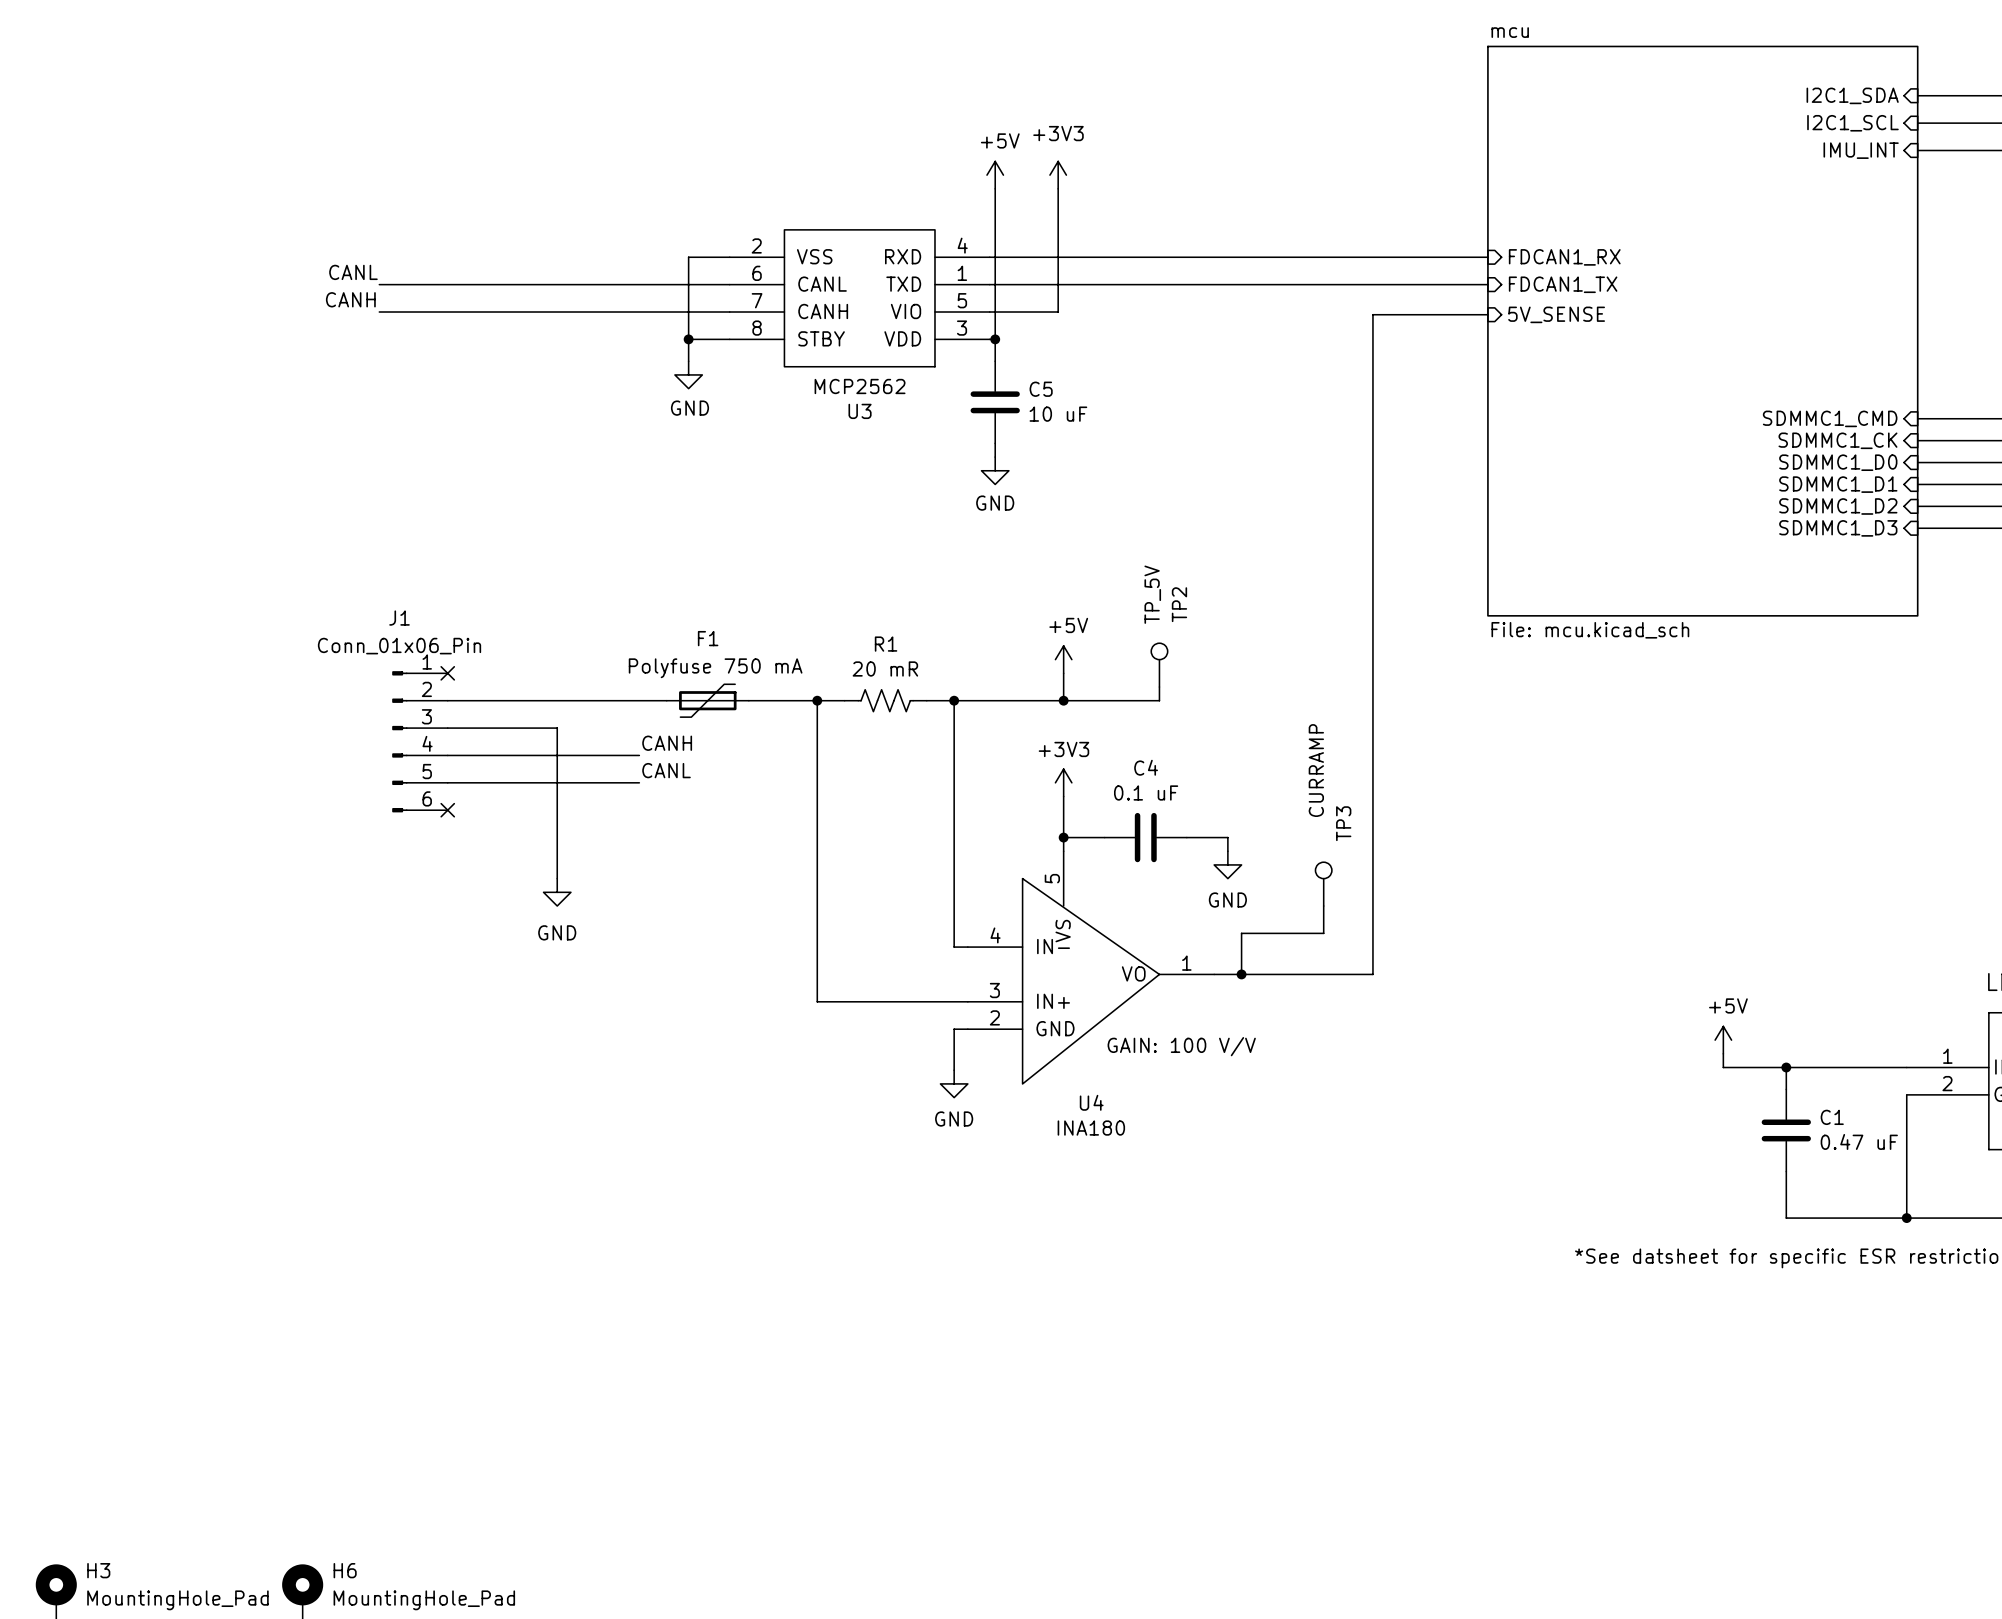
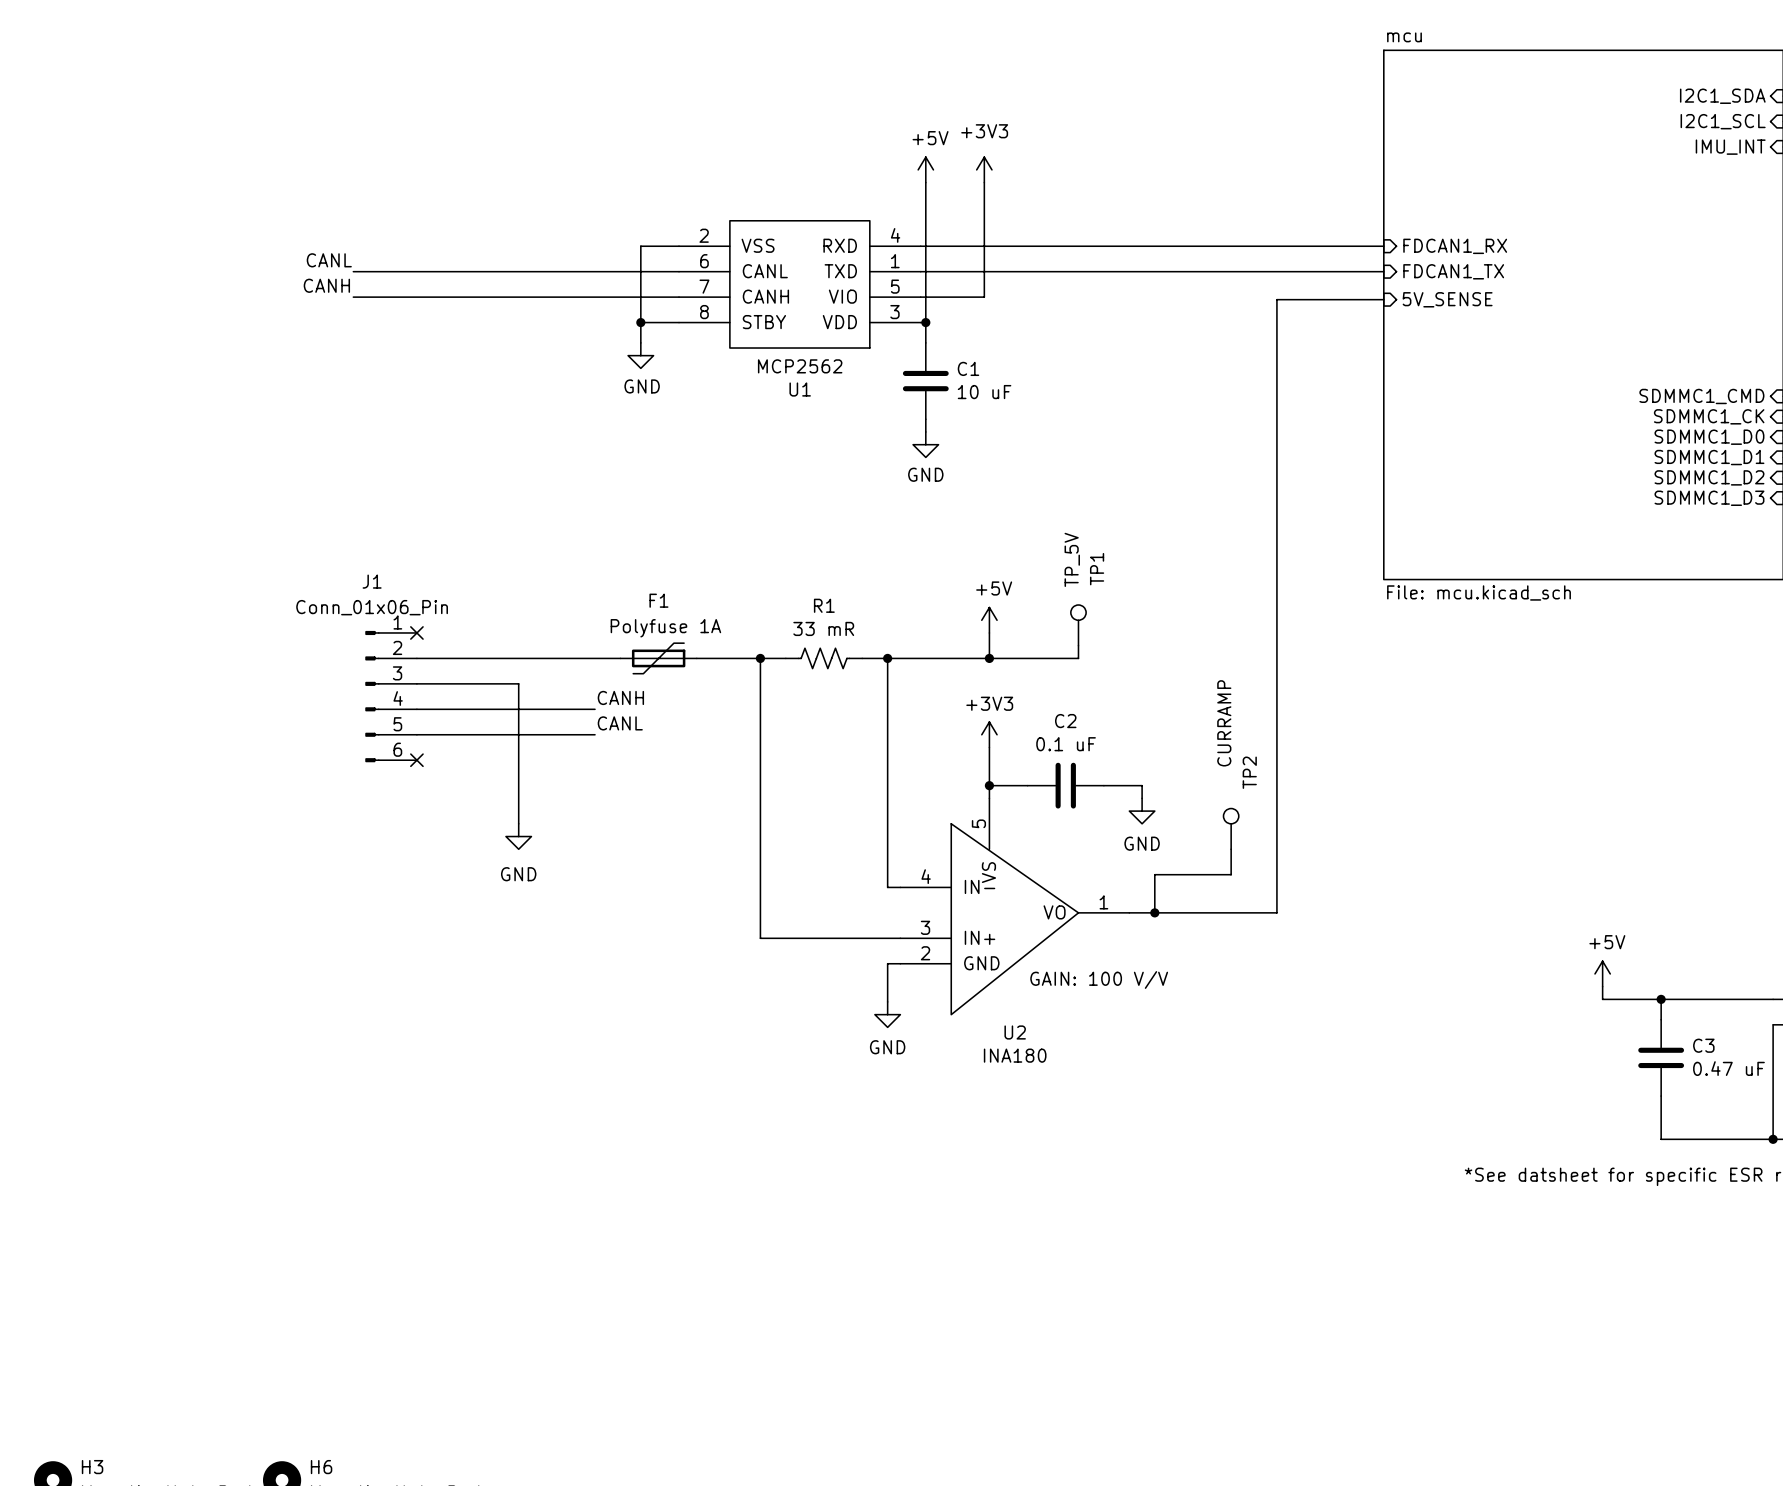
C5 name: C5 (1041, 389) -> C1 (968, 368)
U3 name: U3 (860, 411) -> U1 (800, 389)
TP2 name: TP2 (1179, 604) -> TP1 (1097, 569)
F1 value: Polyfuse 750 mA (715, 668) -> Polyfuse 1A (665, 628)
R1 value: 20 mR (885, 668) -> 33 mR (823, 628)
C4 name: C4 (1146, 767) -> C2 (1065, 721)
TP3 name: TP3 (1343, 823) -> TP2 (1249, 772)
U4 name: U4 (1091, 1102) -> U2 (1015, 1032)
C1 name: C1 (1832, 1117) -> C3 (1703, 1045)

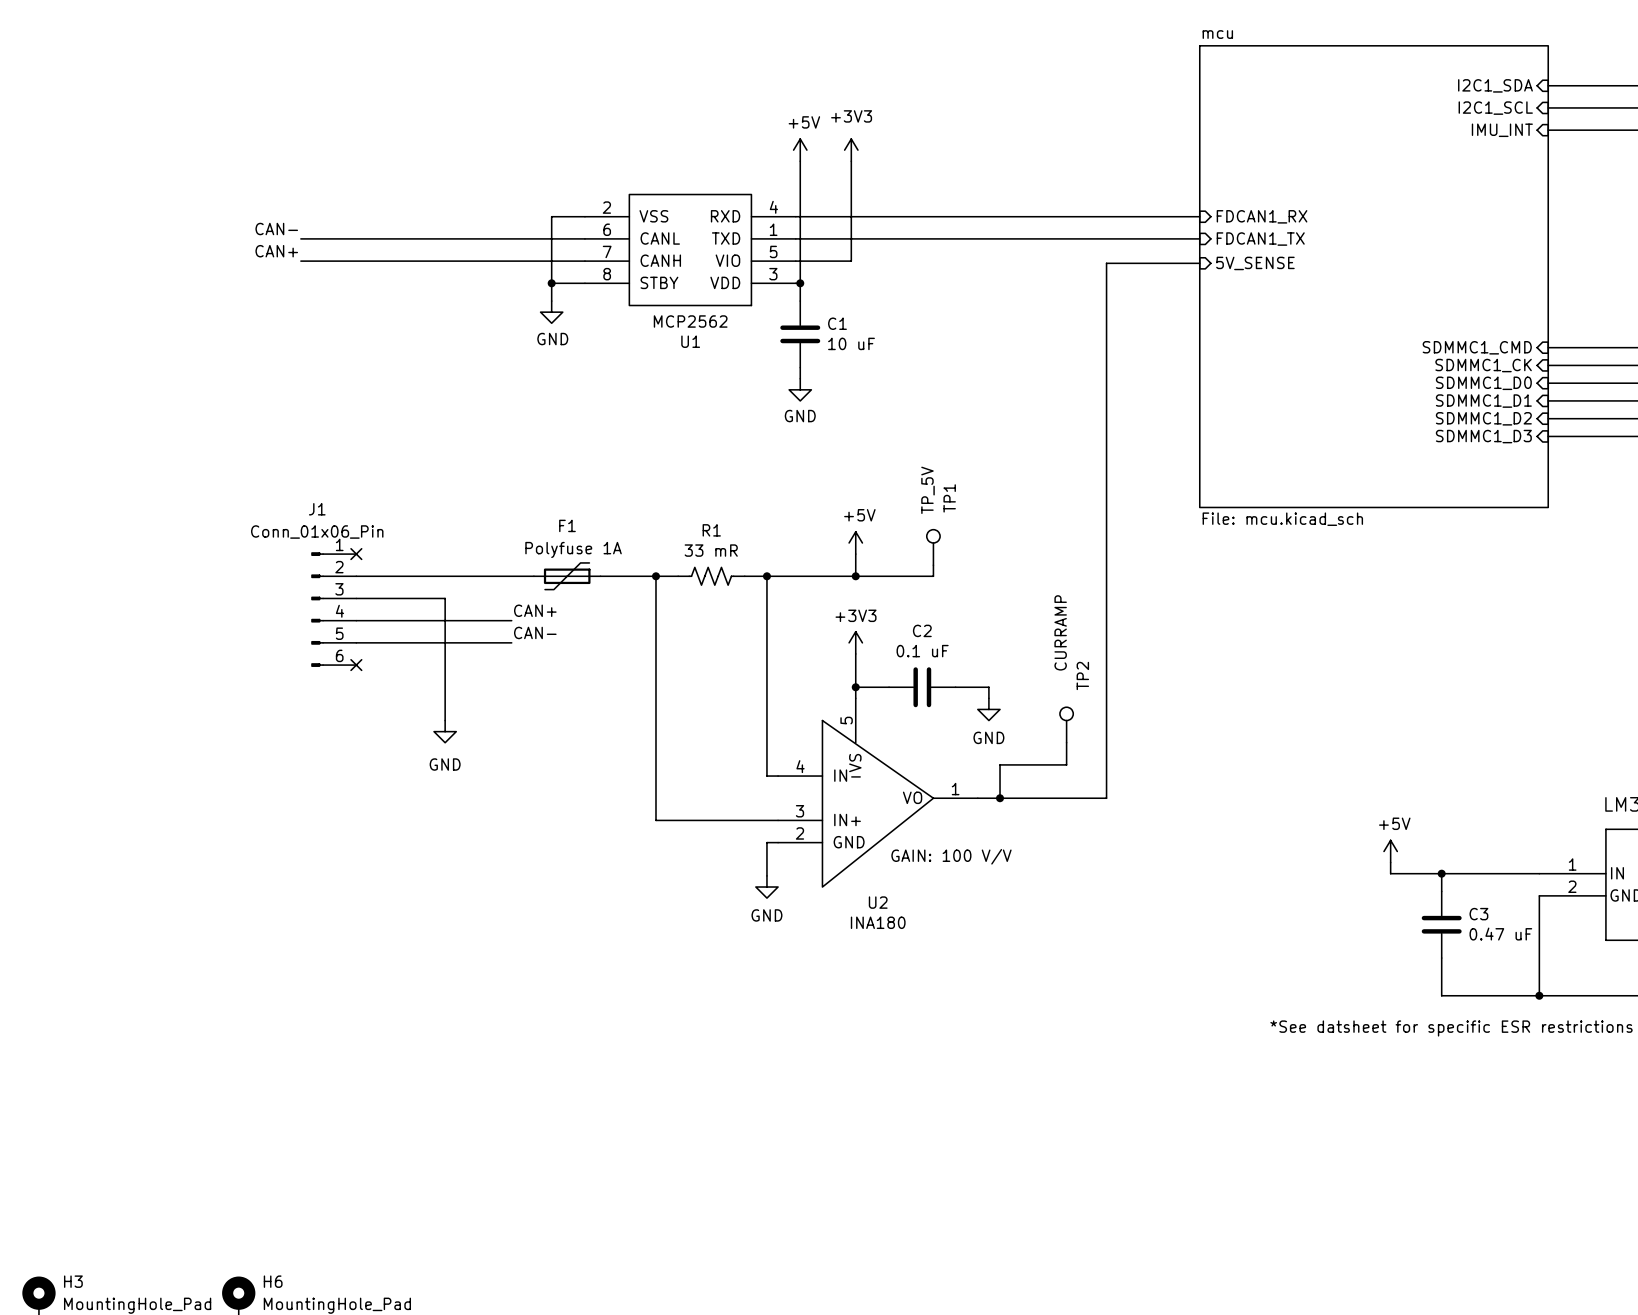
label: CANL (329, 260) -> CAN- (276, 229)
label: CANH (326, 285) -> CAN+ (276, 251)
label: CANH (620, 697) -> CAN+ (535, 610)
label: CANL (620, 723) -> CAN- (535, 632)

